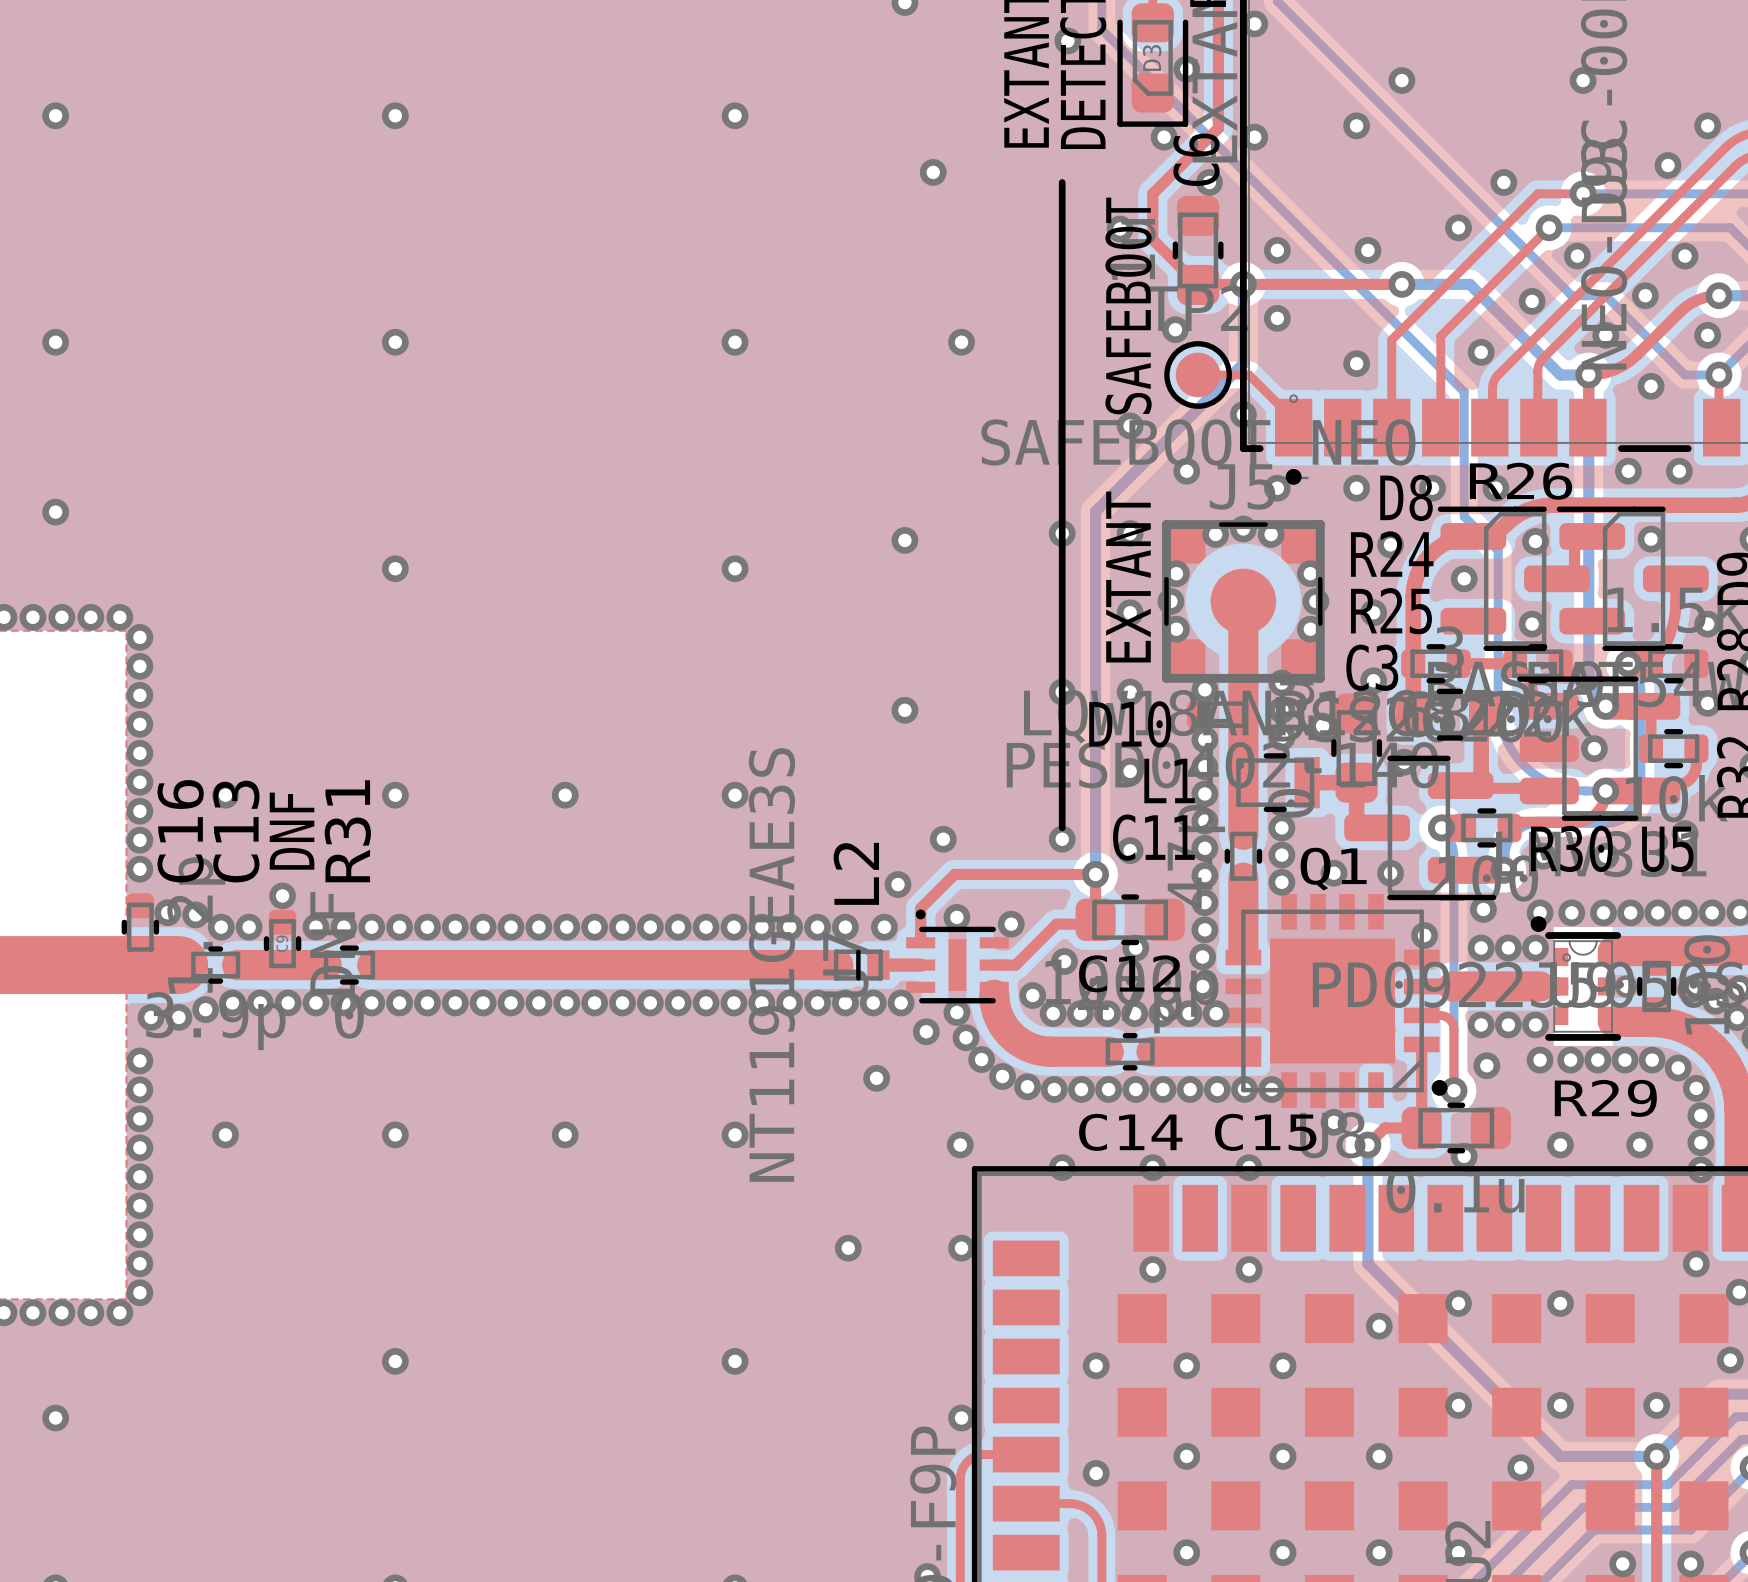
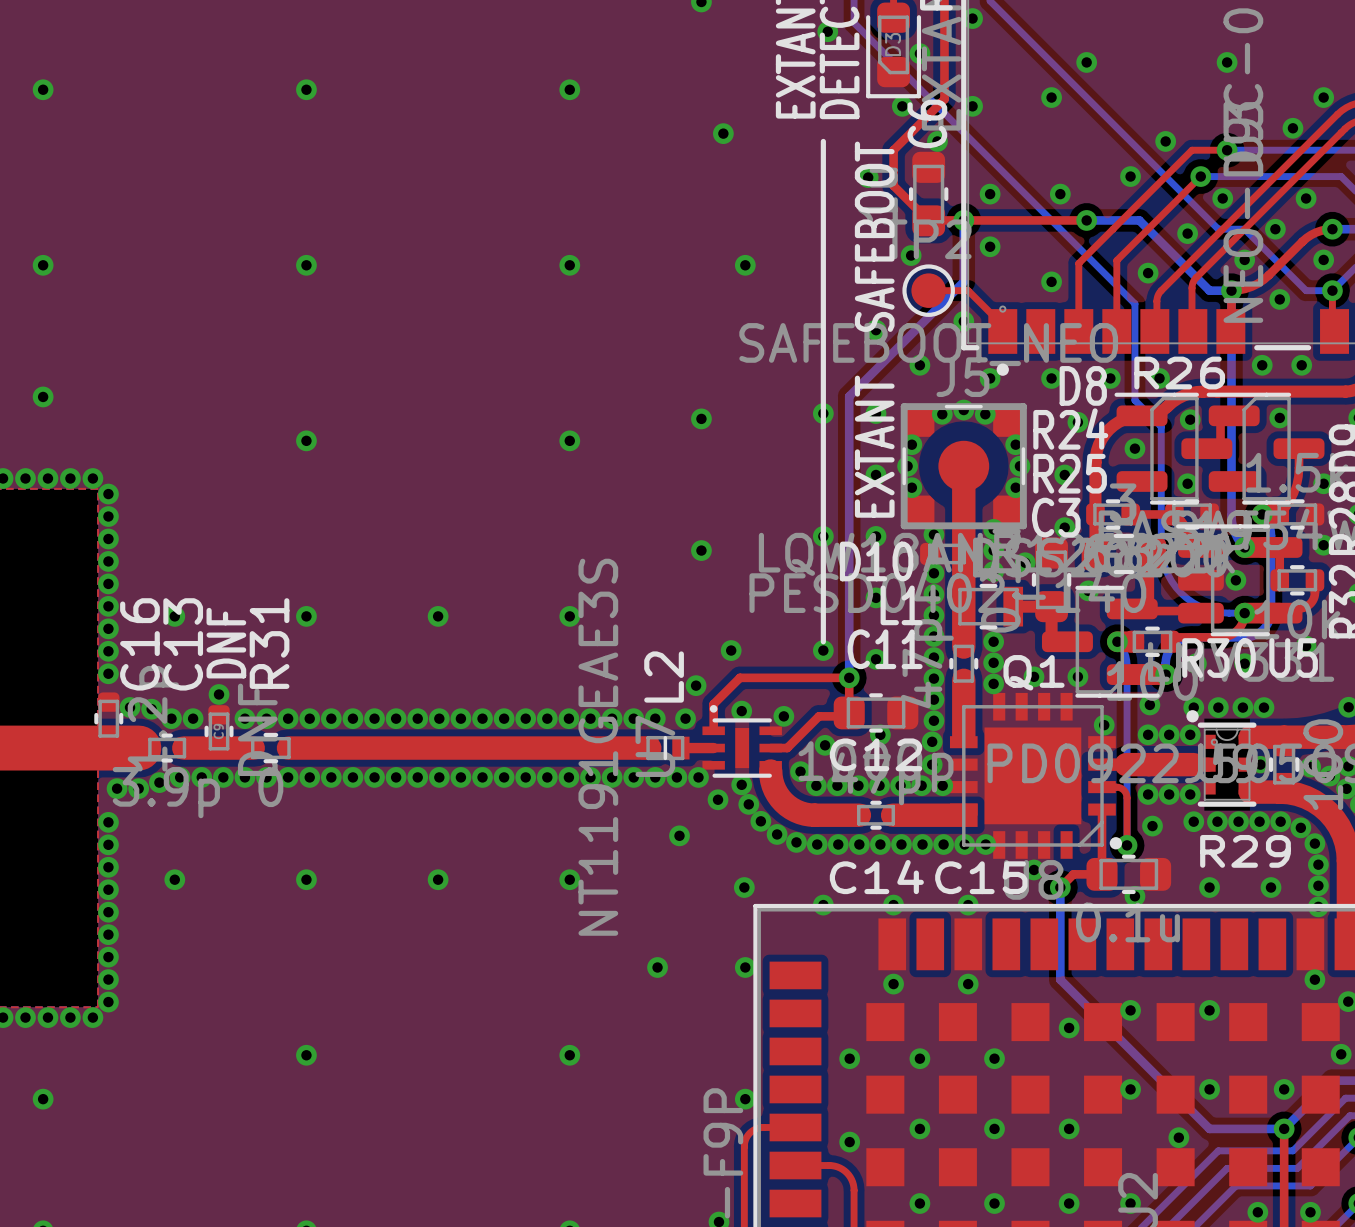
via: (1657, 912) -> none
via: (1685, 912) -> none
via: (1712, 912) -> none

